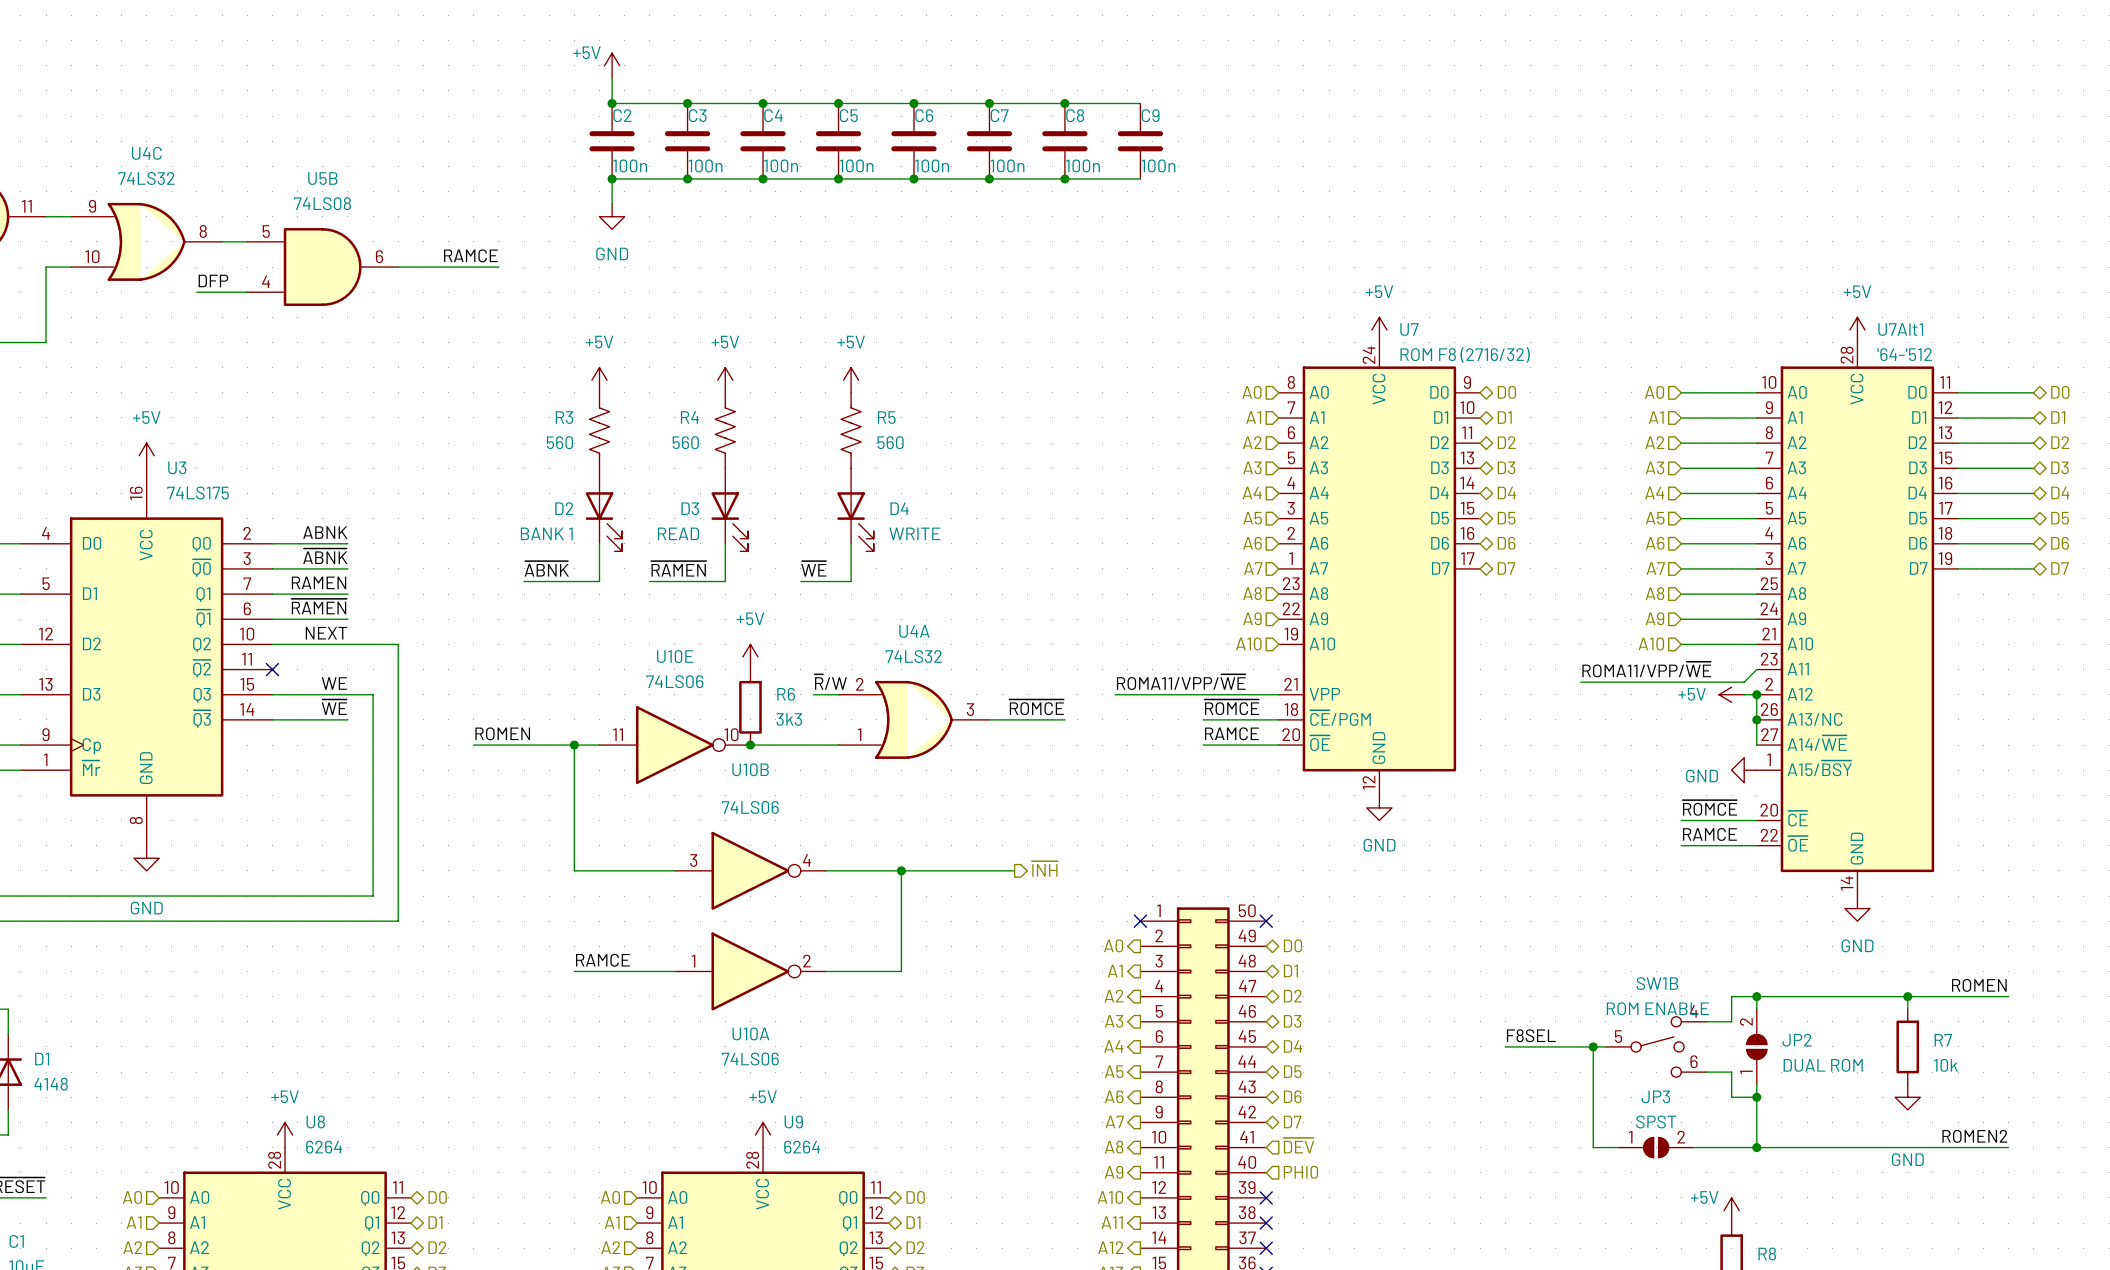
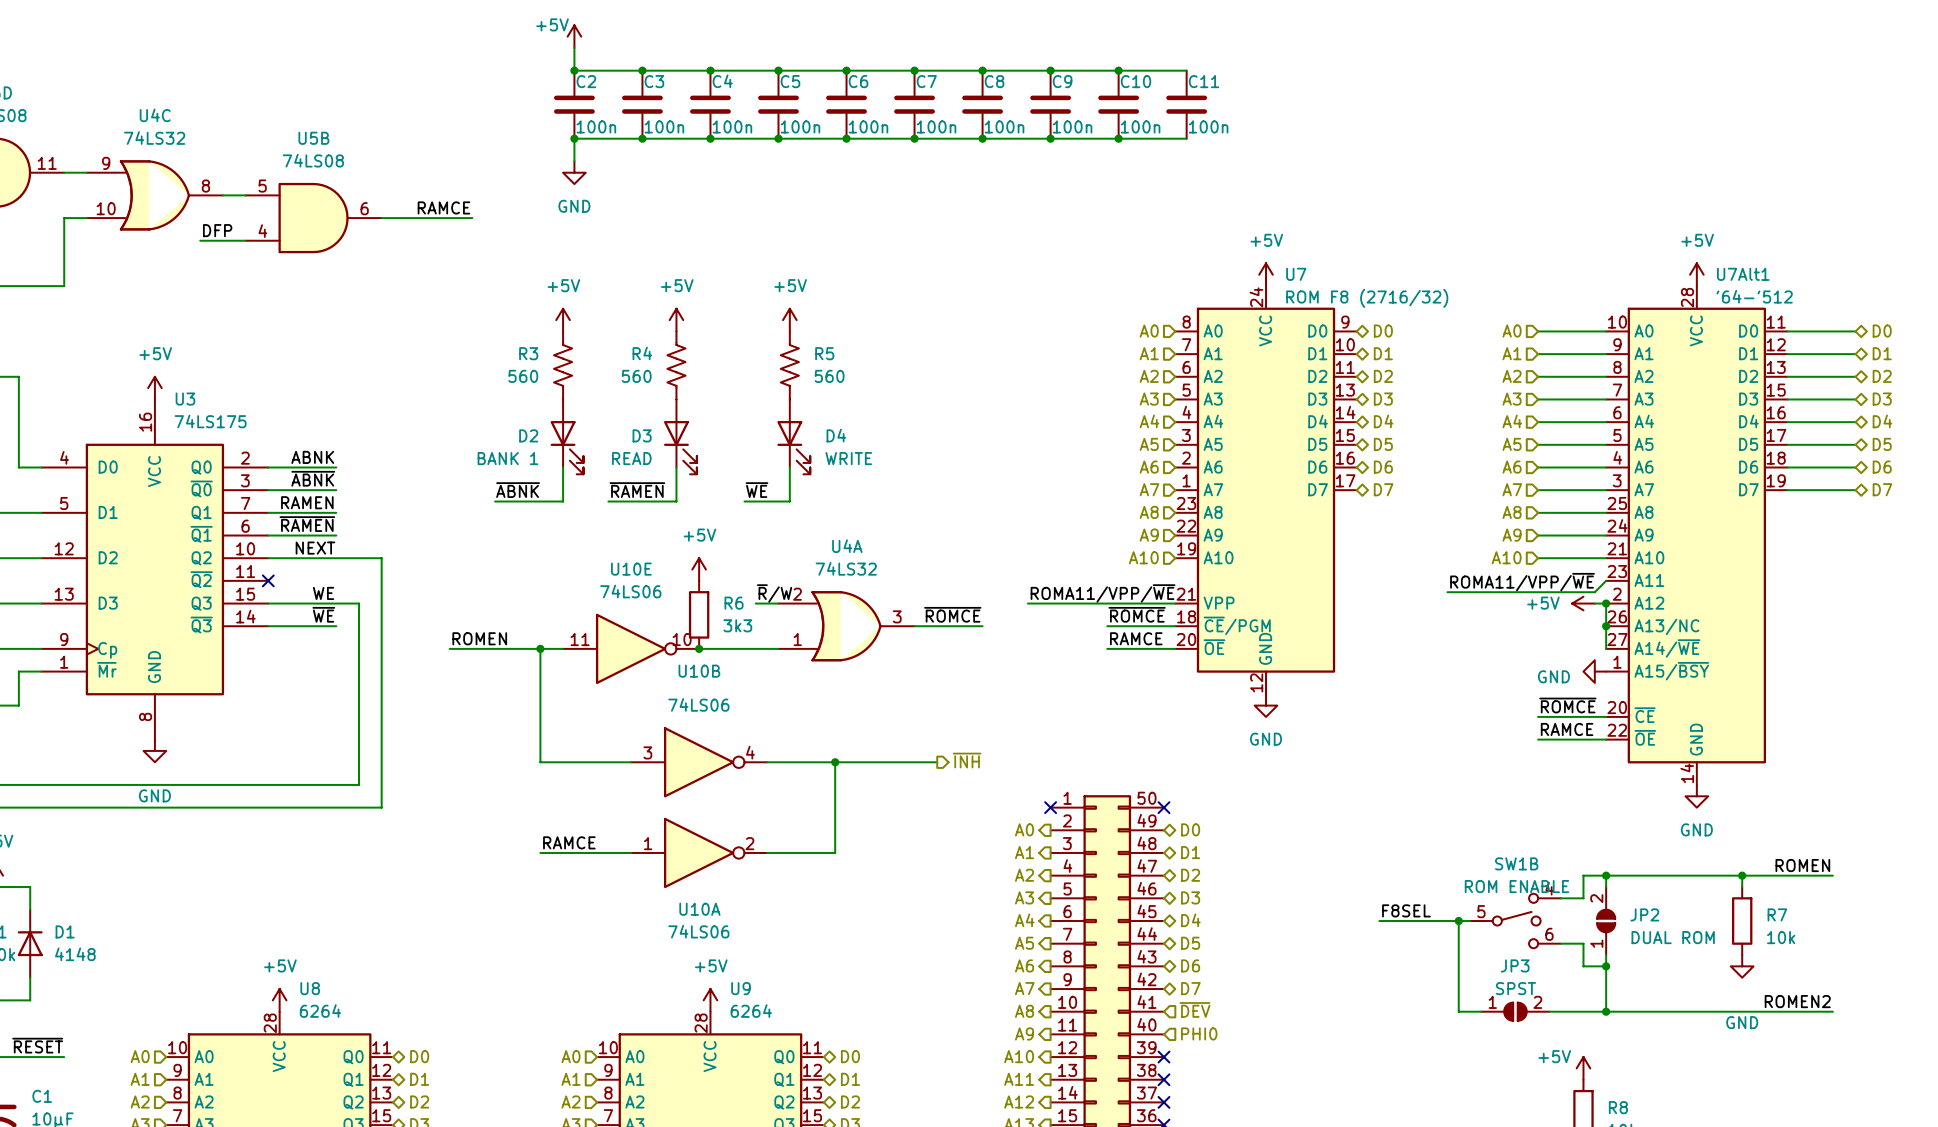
wire: none -> (1050, 70) (1186, 70)
junction: none -> (1050, 70)
junction: none -> (1118, 70)
C10: none -> 100n (1118, 104)
C11: none -> 100n (1186, 104)
wire: none -> (1050, 138) (1186, 138)
junction: none -> (1050, 138)
junction: none -> (1118, 138)

